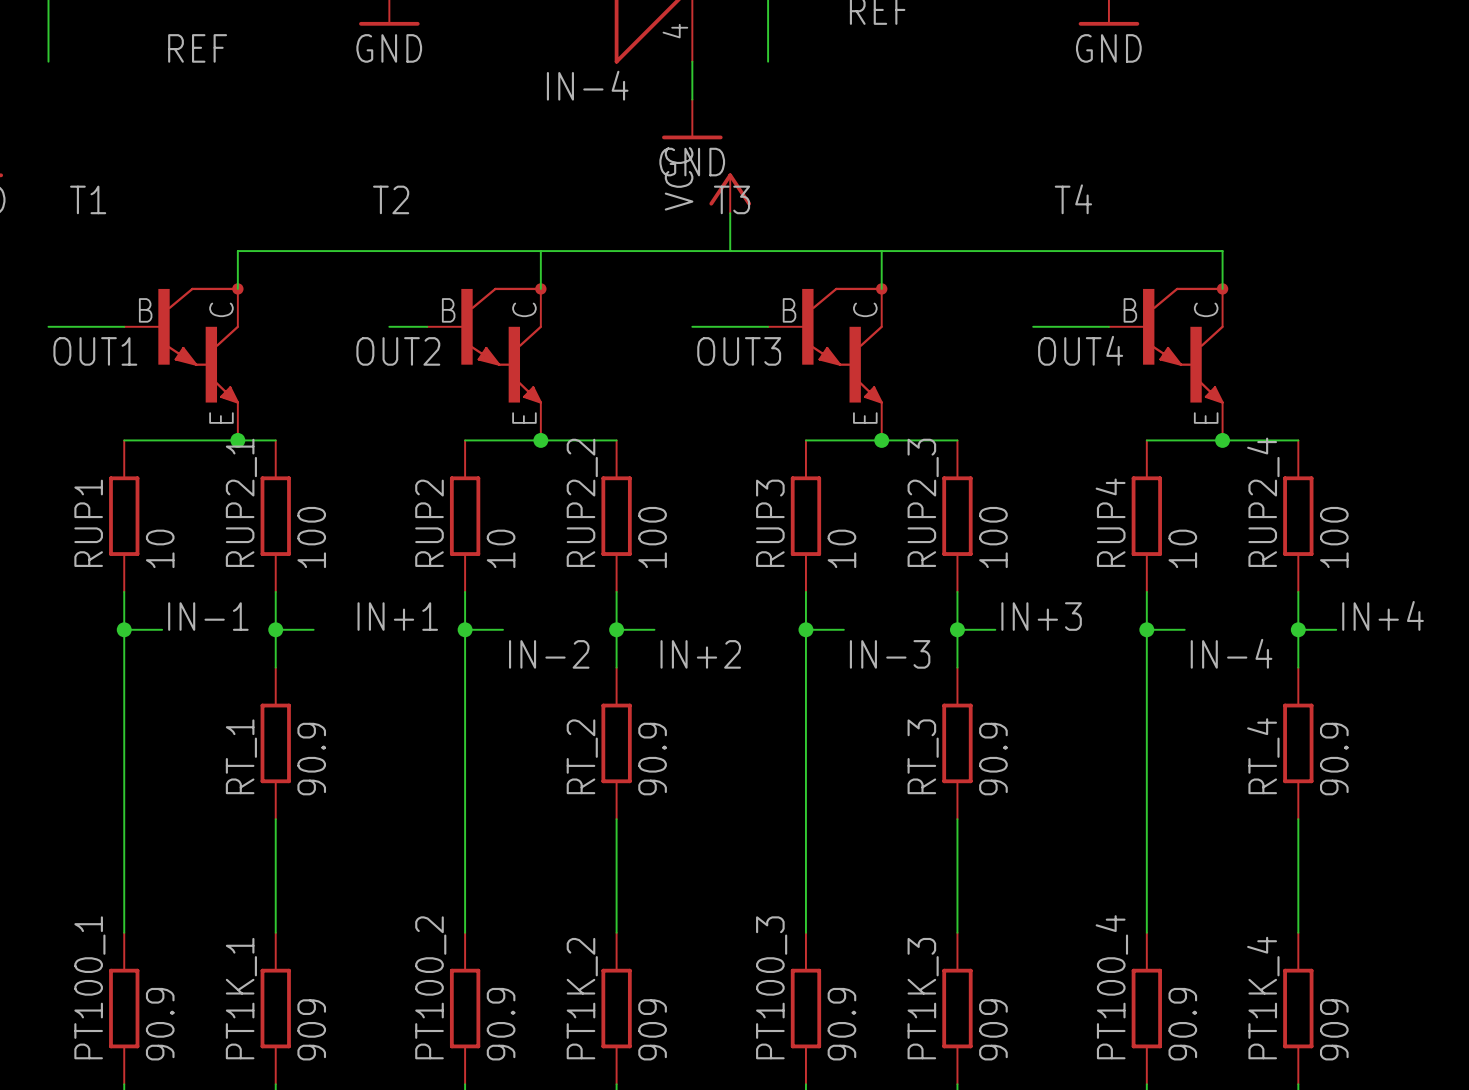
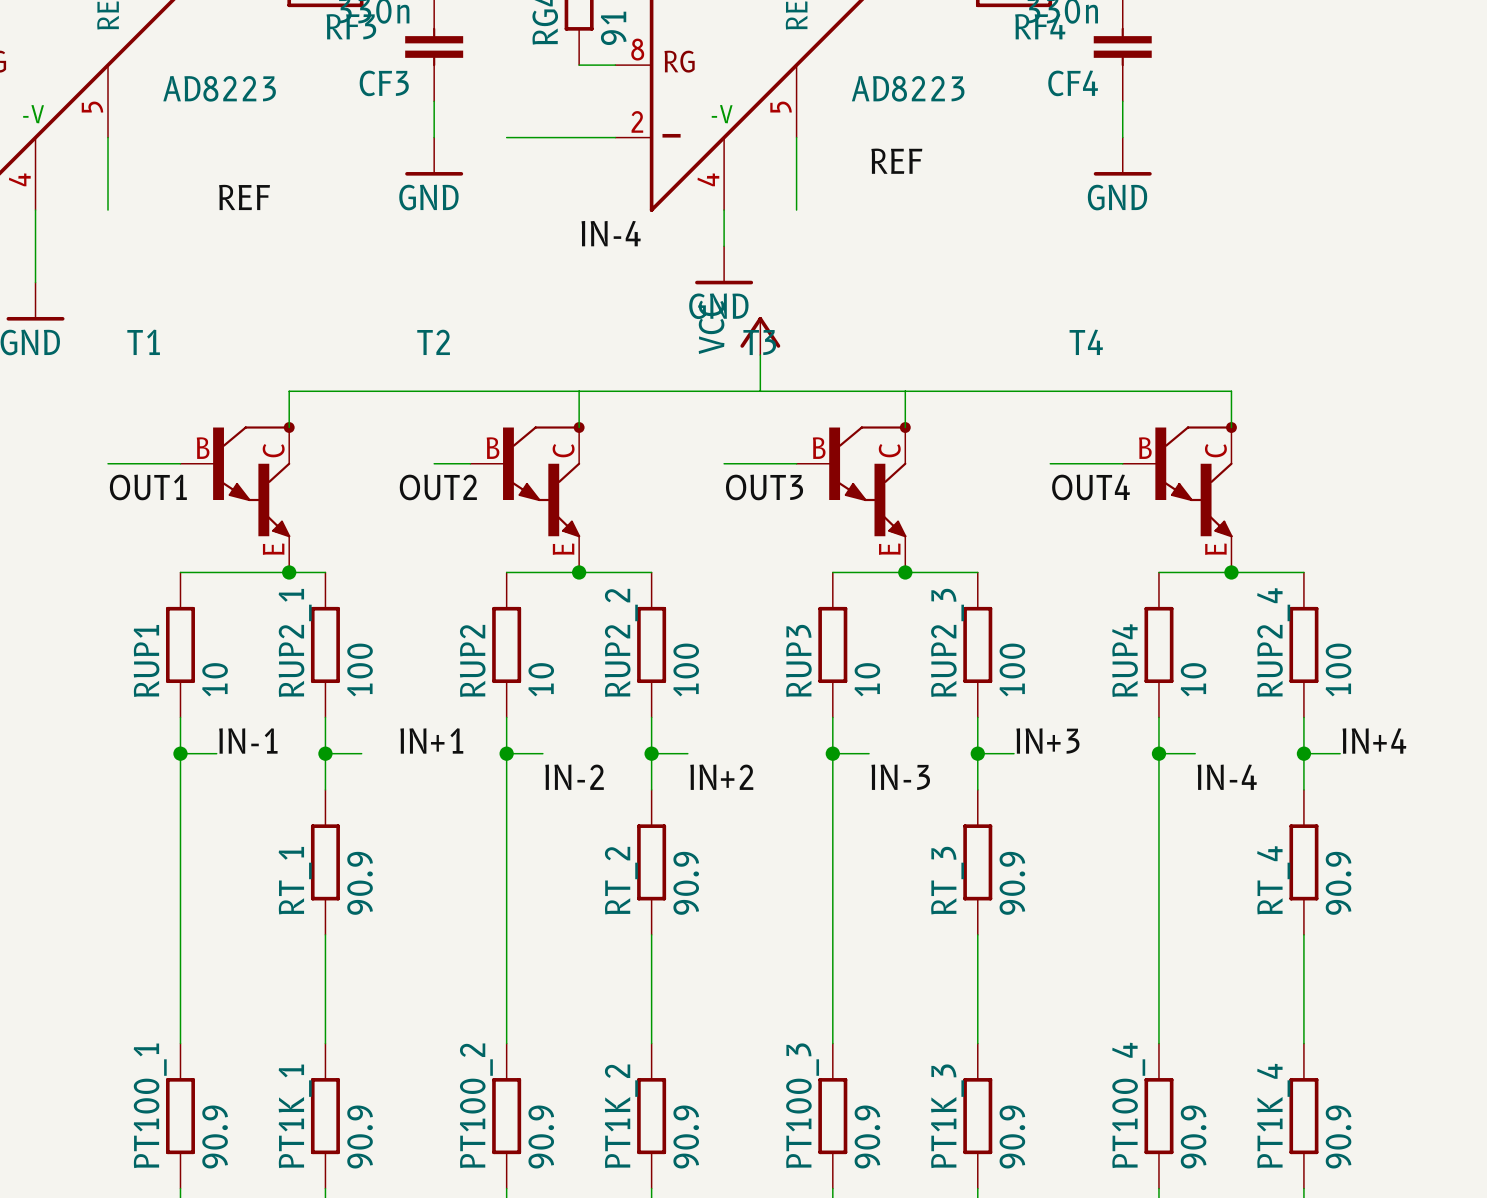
PT1K_1 value: 909 (311, 1029) -> 90.9 (360, 1137)
PT1K_2 value: 909 (652, 1029) -> 90.9 (686, 1137)
PT1K_3 value: 909 (993, 1029) -> 90.9 (1012, 1137)
PT1K_4 value: 909 (1334, 1029) -> 90.9 (1338, 1137)

